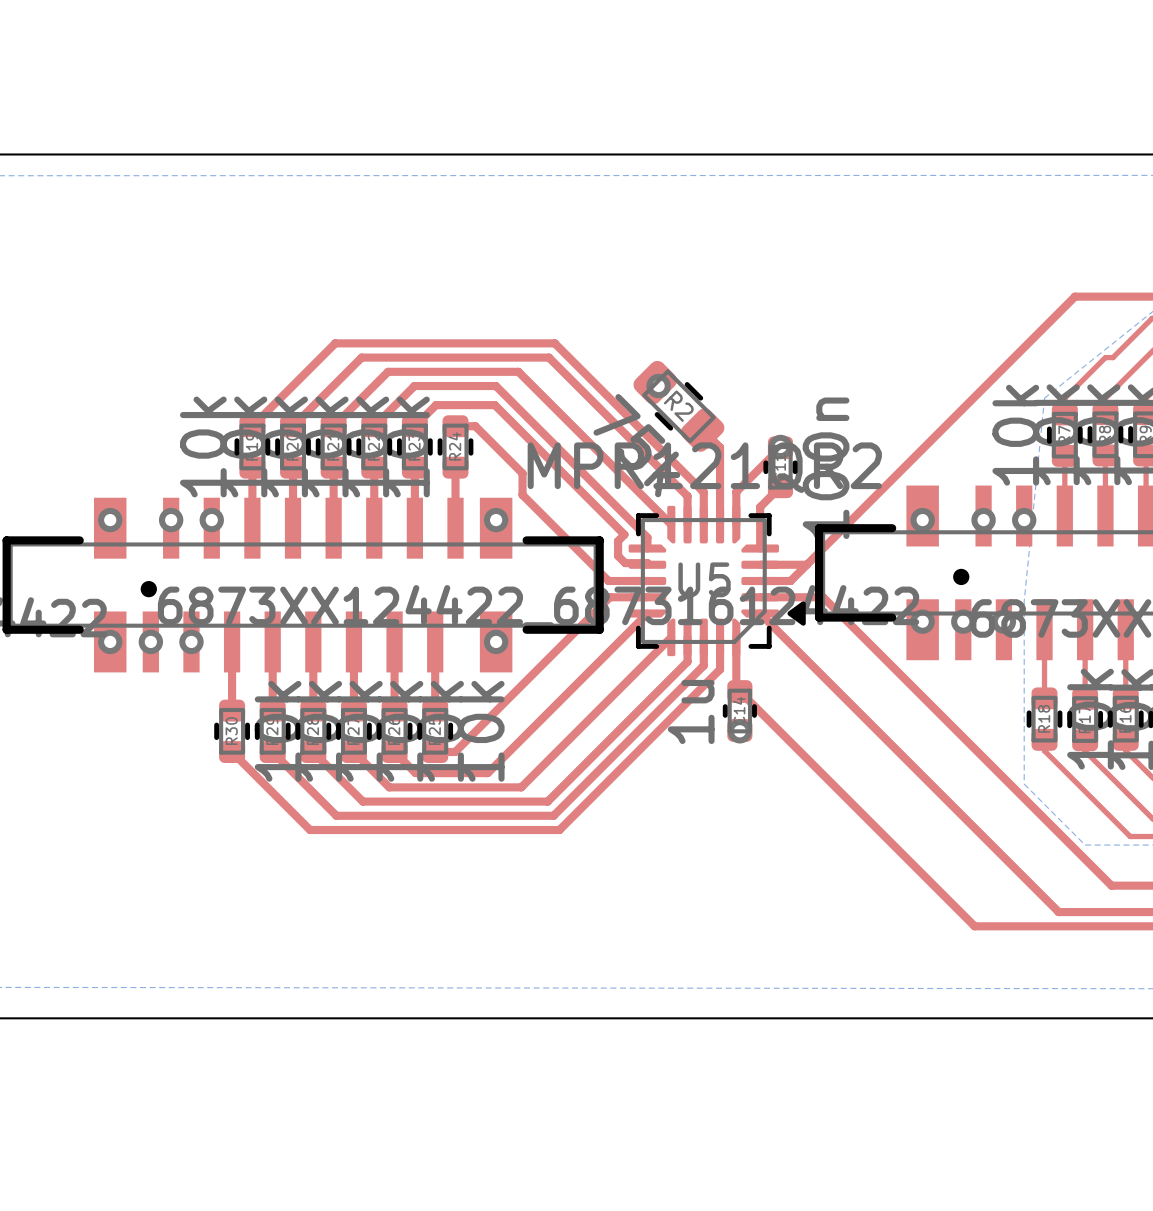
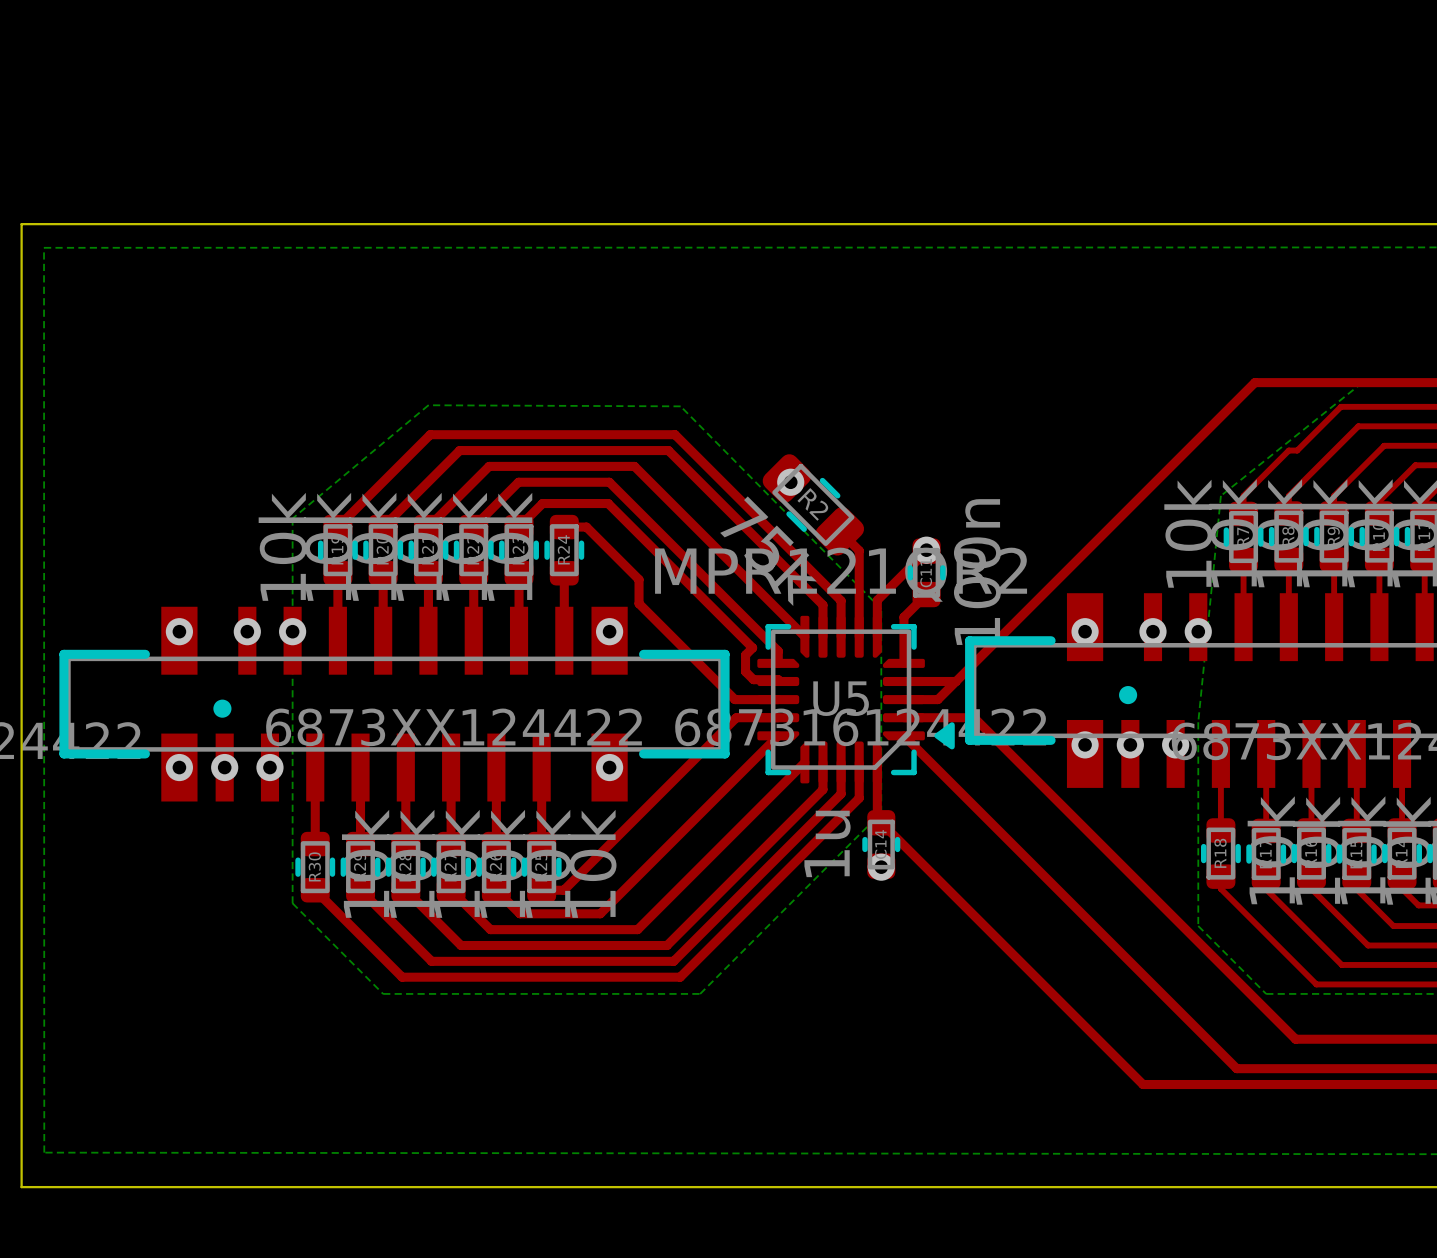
bottom zone outline: none -> (428, 405) (680, 406) (881, 609) (881, 812) (700, 993) (383, 993) (292, 903) (292, 518) (428, 405)

